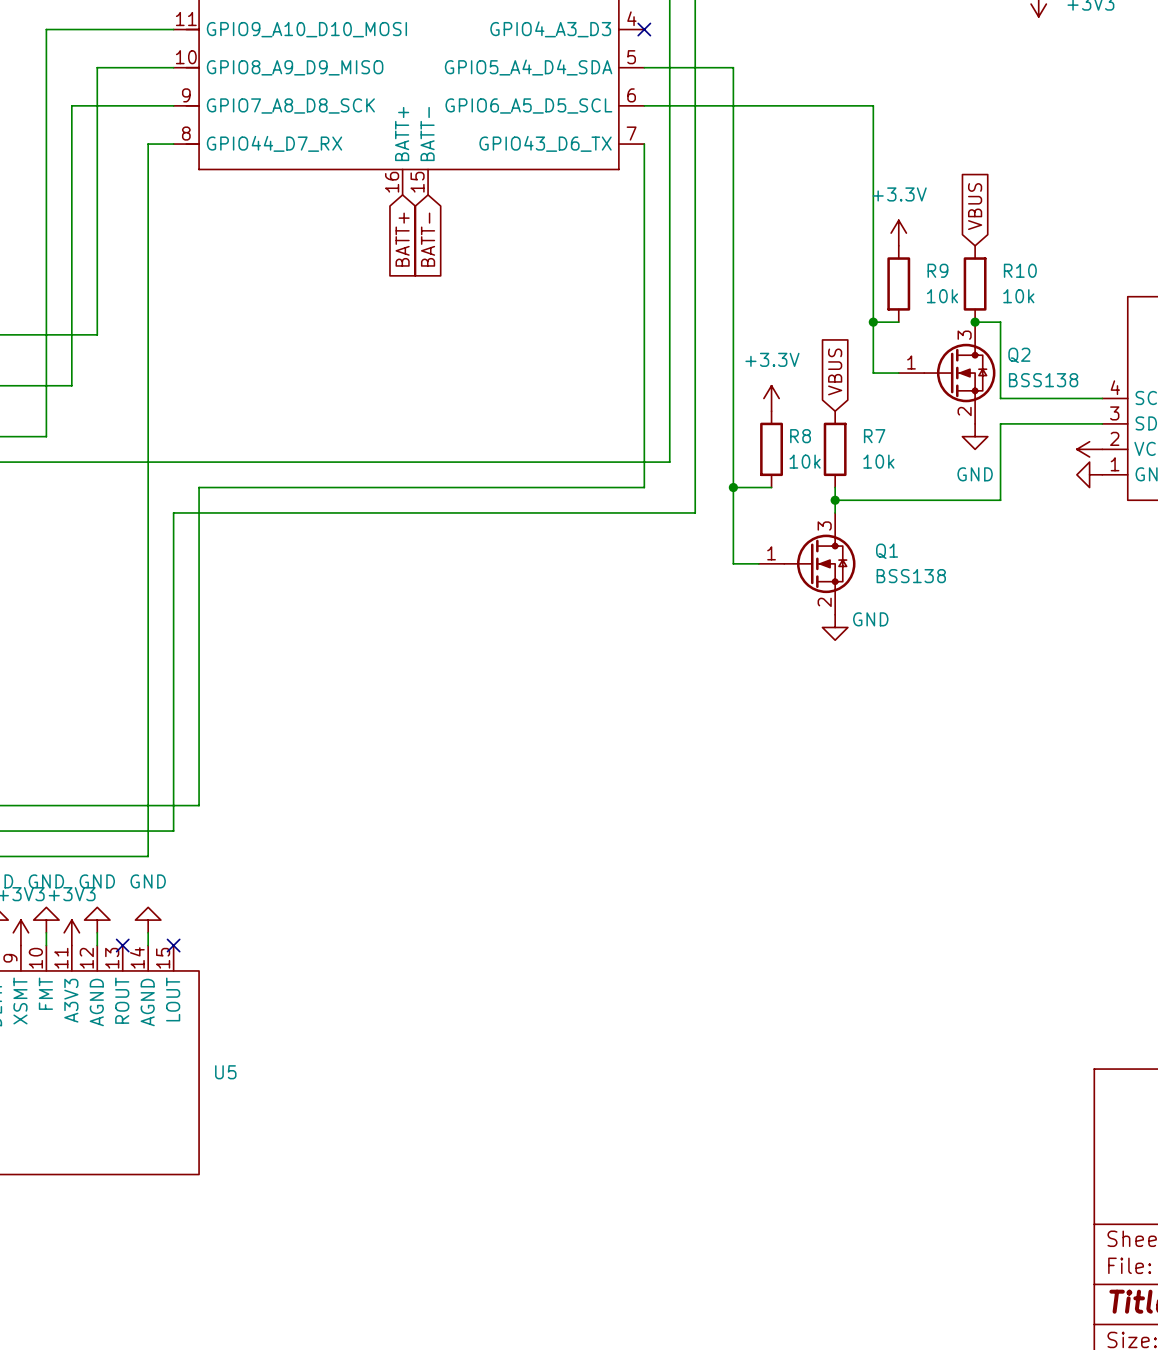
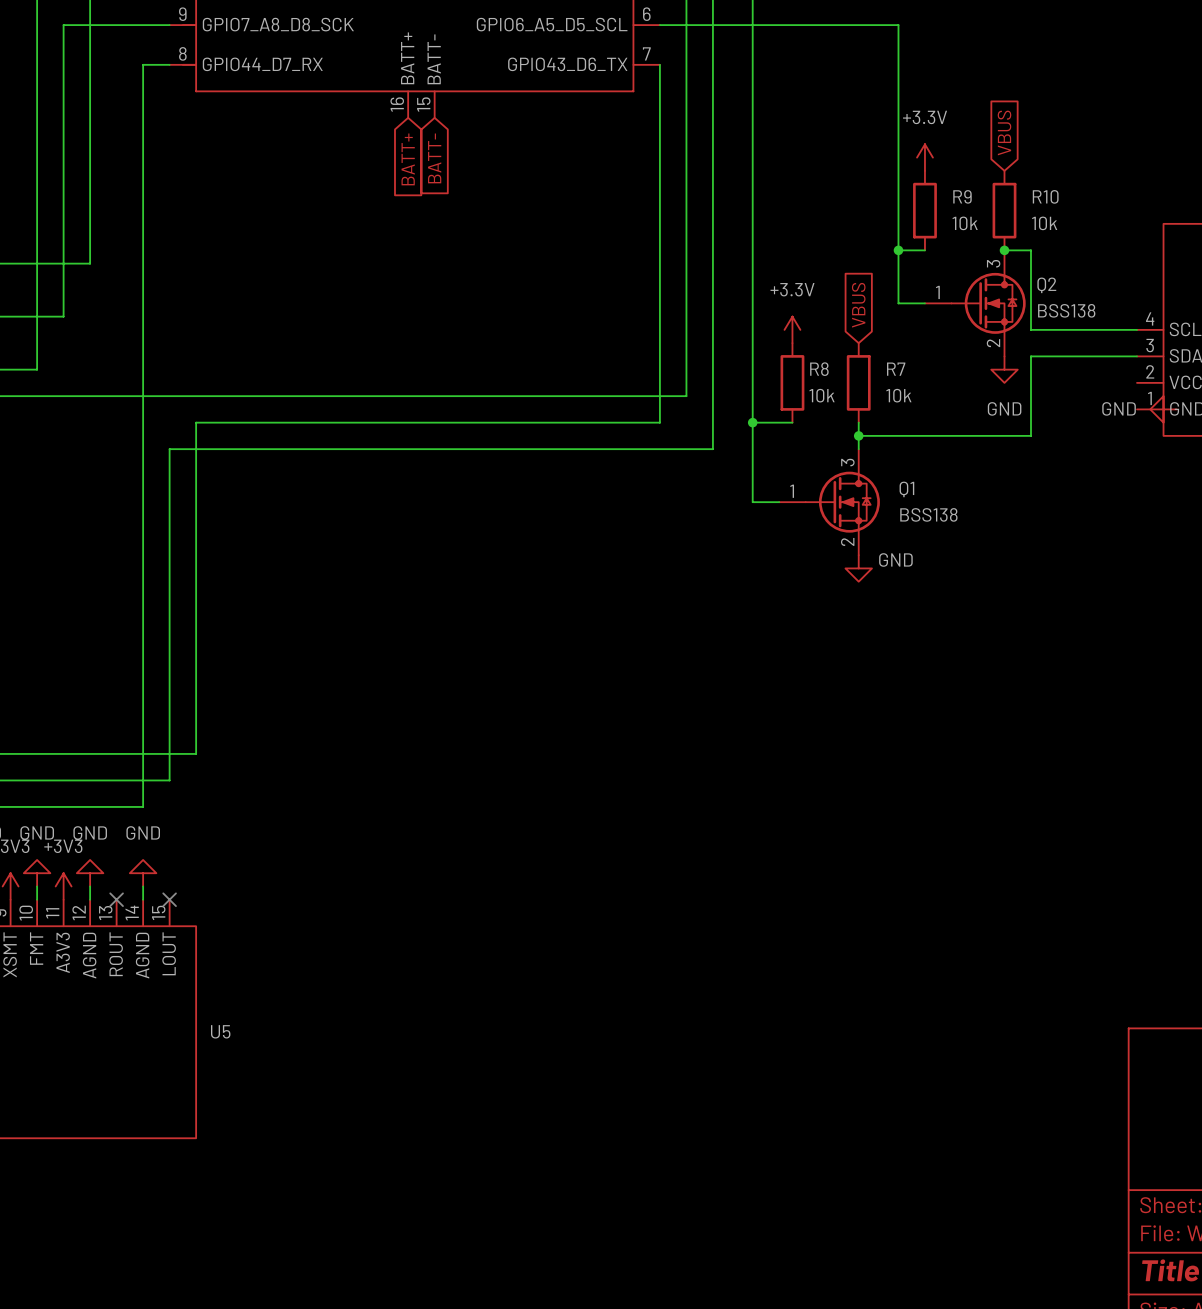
power symbol: (1089, 449) -> none
power symbol: (1089, 474) -> none
power symbol: none -> GND (1163, 409)

